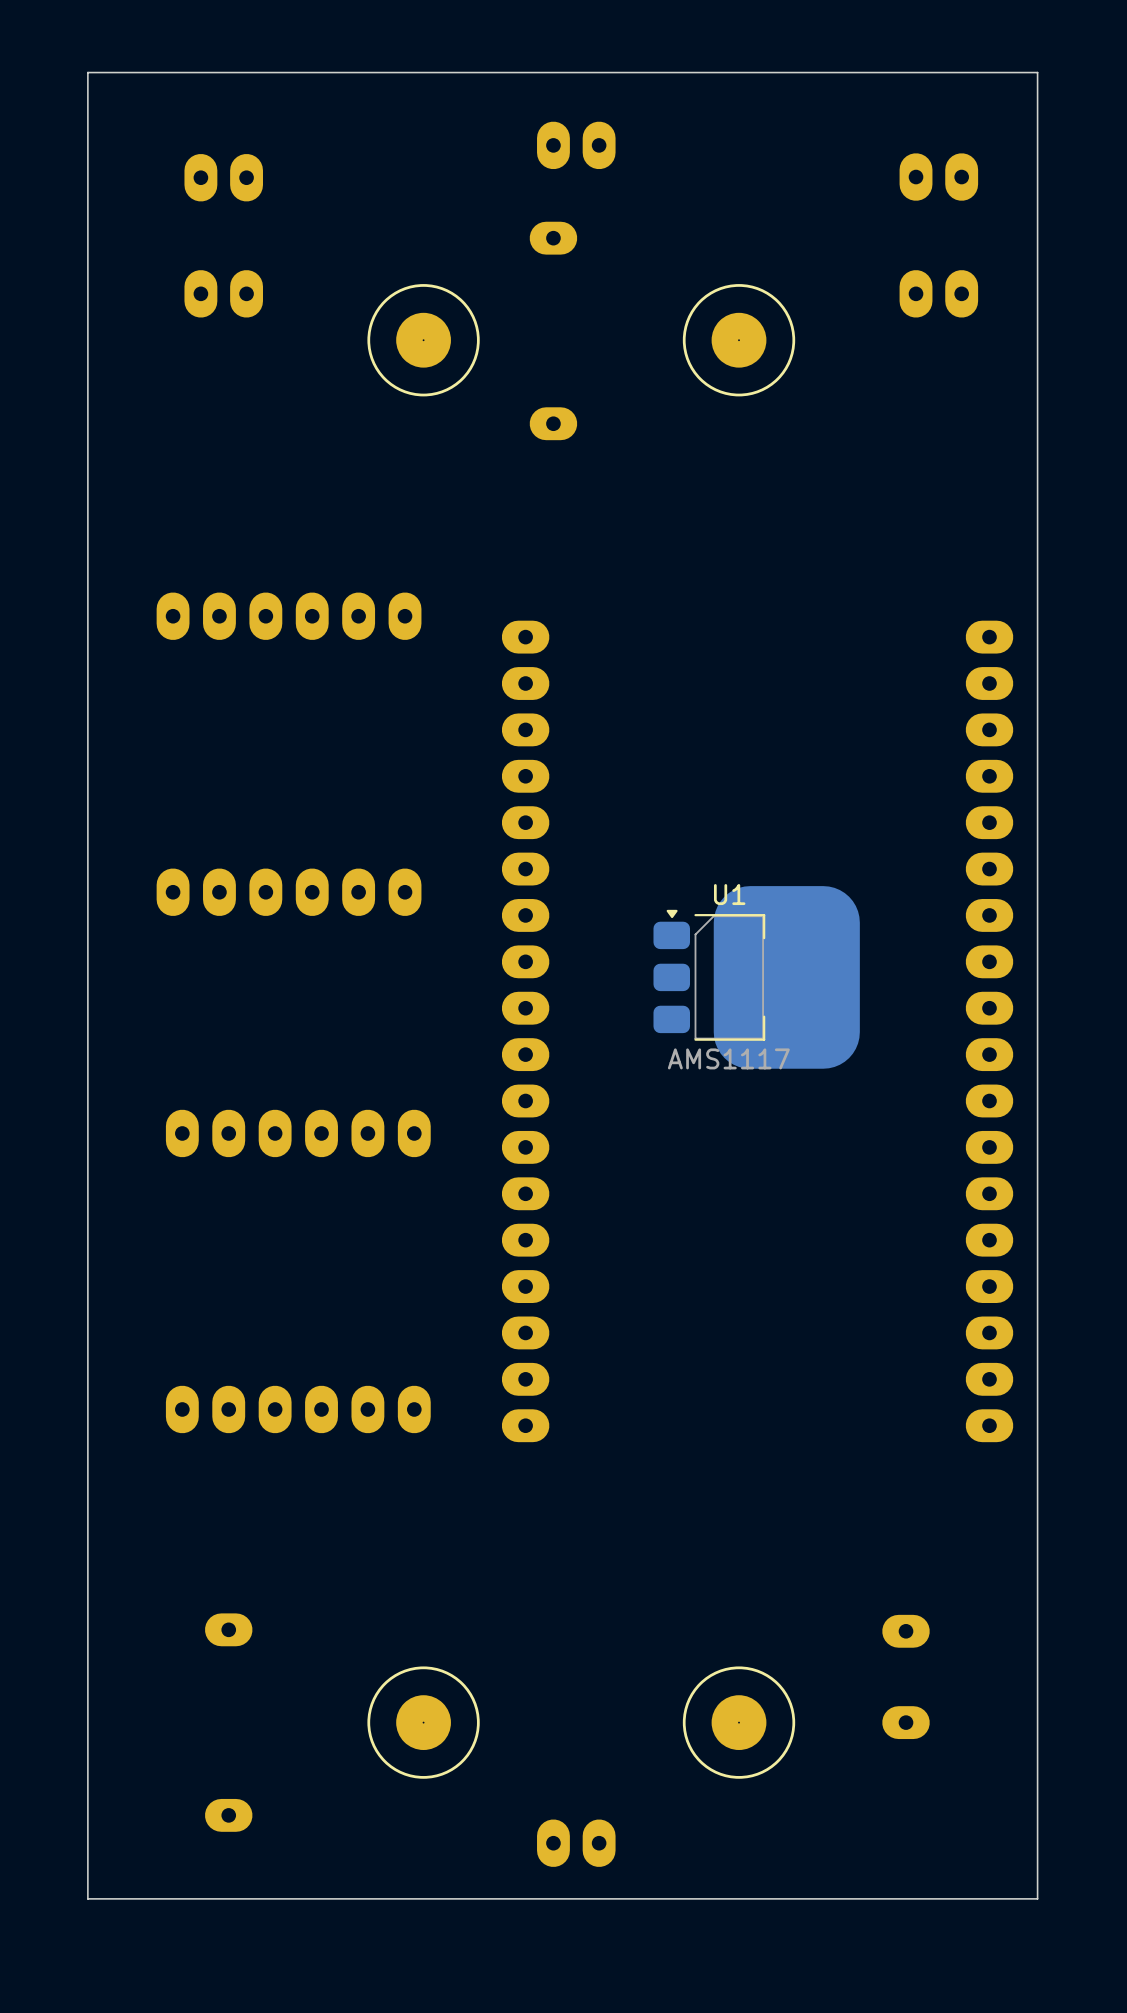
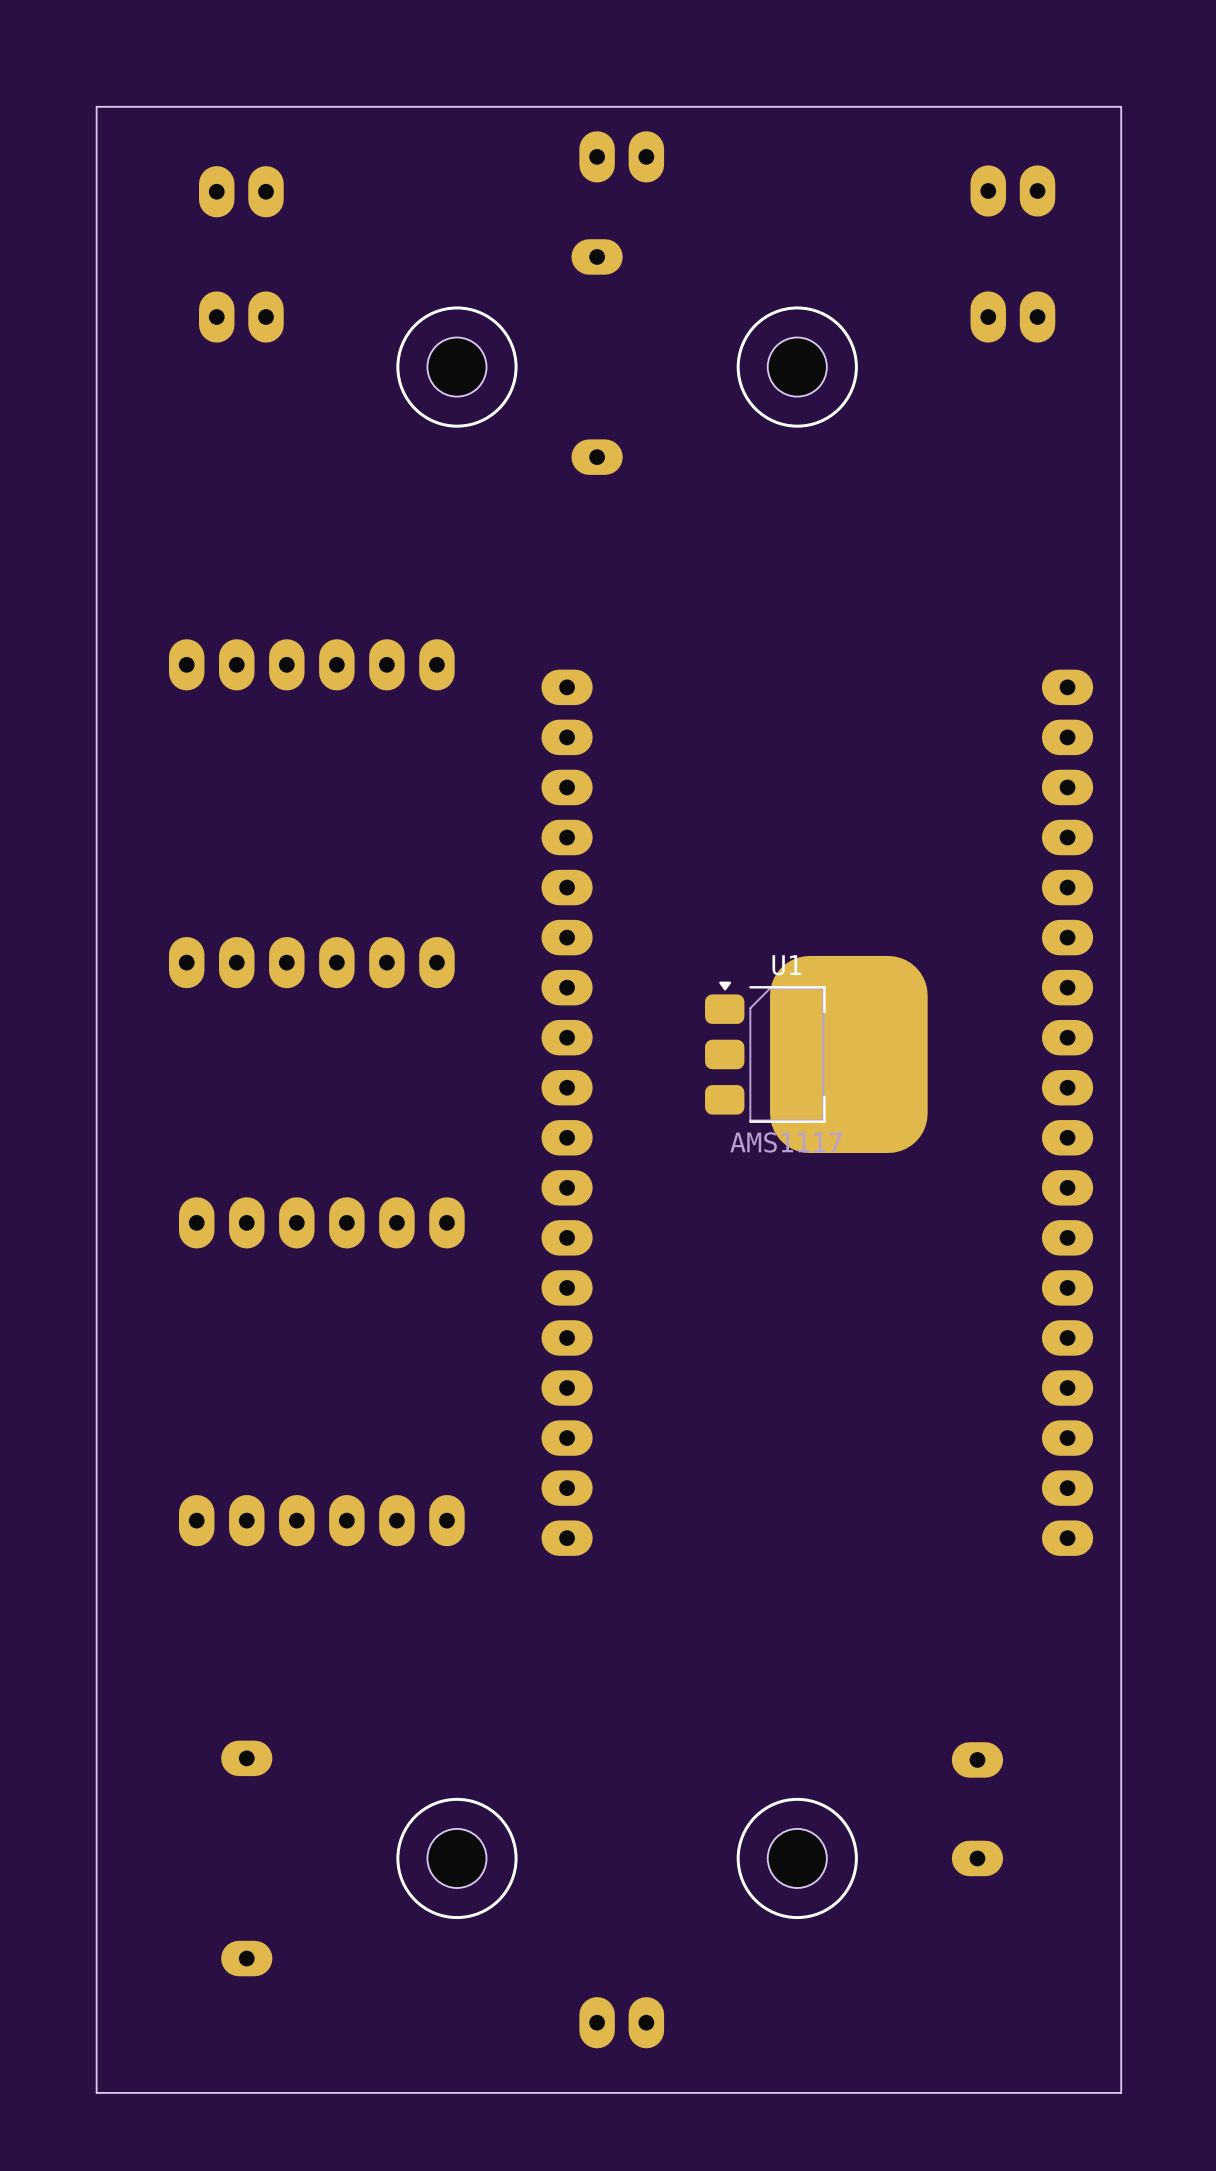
board edge: (1037, 72) (87, 72) (87, 1898) (1037, 1898) (1037, 72) -> (1121, 106) (1121, 2092) (96, 2092) (96, 106) (1121, 106)
part footprint: [367, 284, 480, 397] -> [396, 306, 518, 428]
part footprint: [682, 284, 796, 397] -> [736, 306, 858, 428]
part footprint: [367, 1666, 480, 1779] -> [396, 1797, 518, 1920]
part footprint: [682, 1666, 796, 1779] -> [736, 1797, 858, 1920]
part position: (576, 1843) -> (621, 2022)

